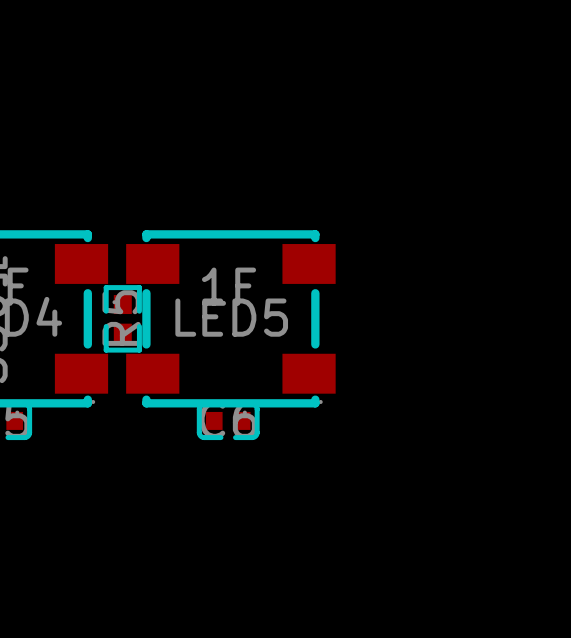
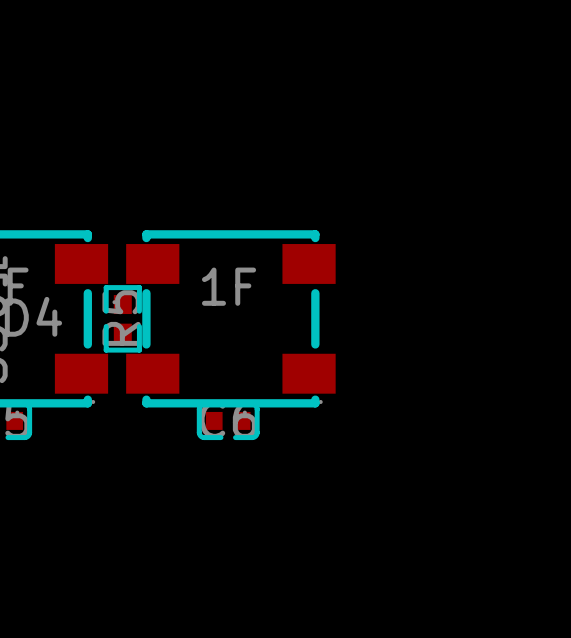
LED5 name: LED5 (231, 317) -> none

